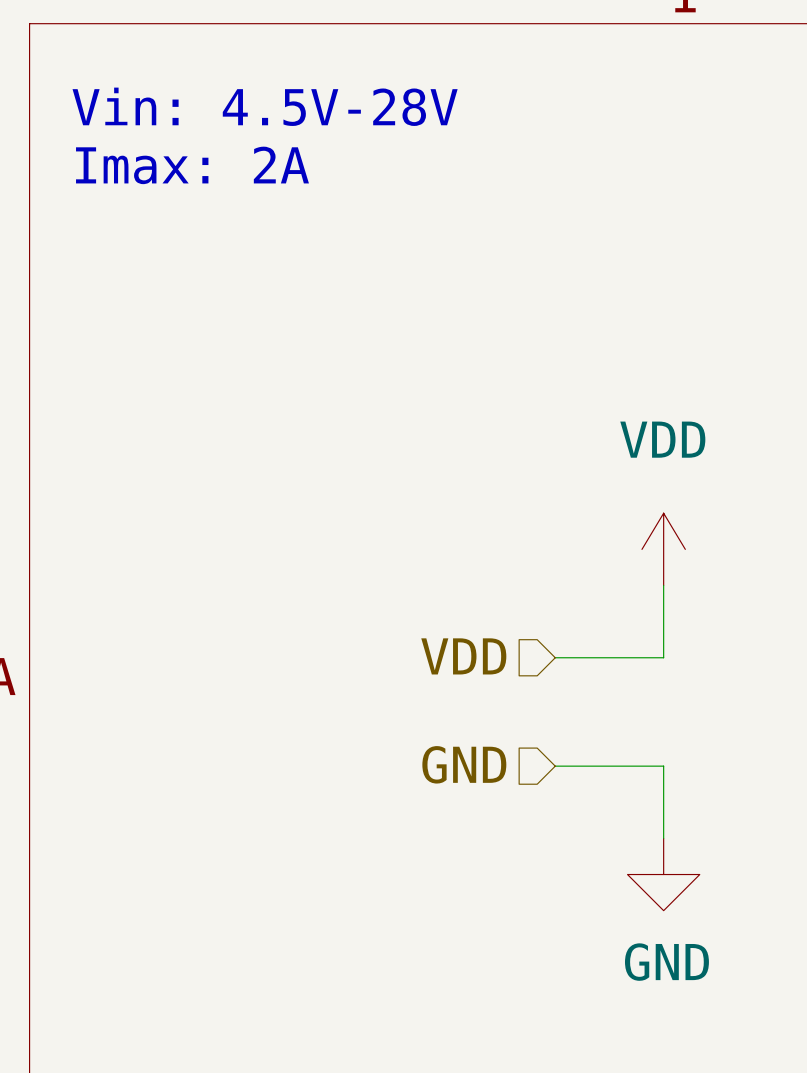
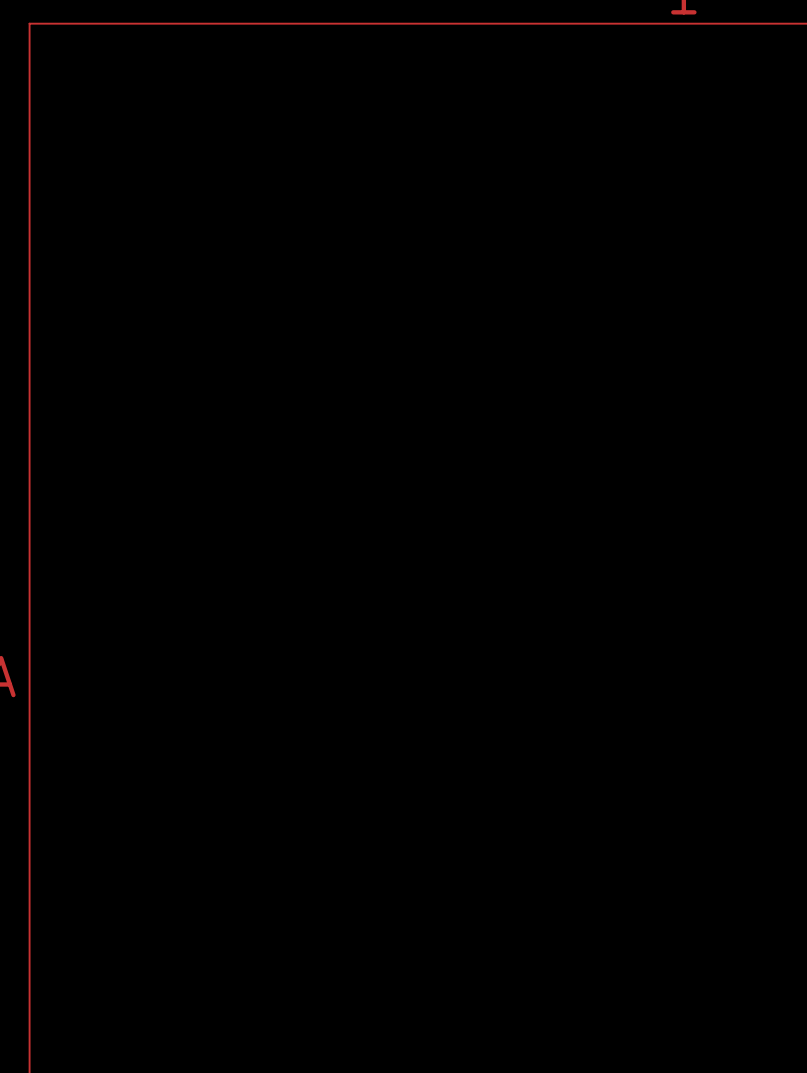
text: Vin: 4.5V-28V (265, 106) -> none
text: Imax: 2A (192, 165) -> none
power symbol: VDD (663, 549) -> none
wire: (663, 585) (663, 657) (555, 657) -> none
hierarchical label: VDD (463, 656) -> none
hierarchical label: GND (464, 764) -> none
wire: (555, 766) (663, 766) (663, 838) -> none
power symbol: GND (663, 874) -> none

